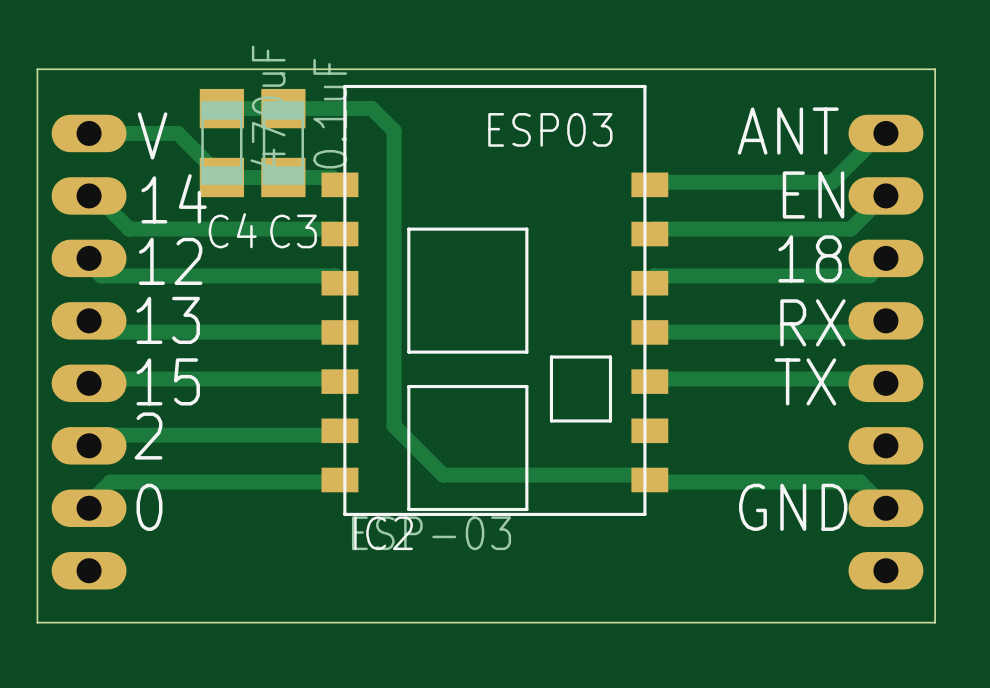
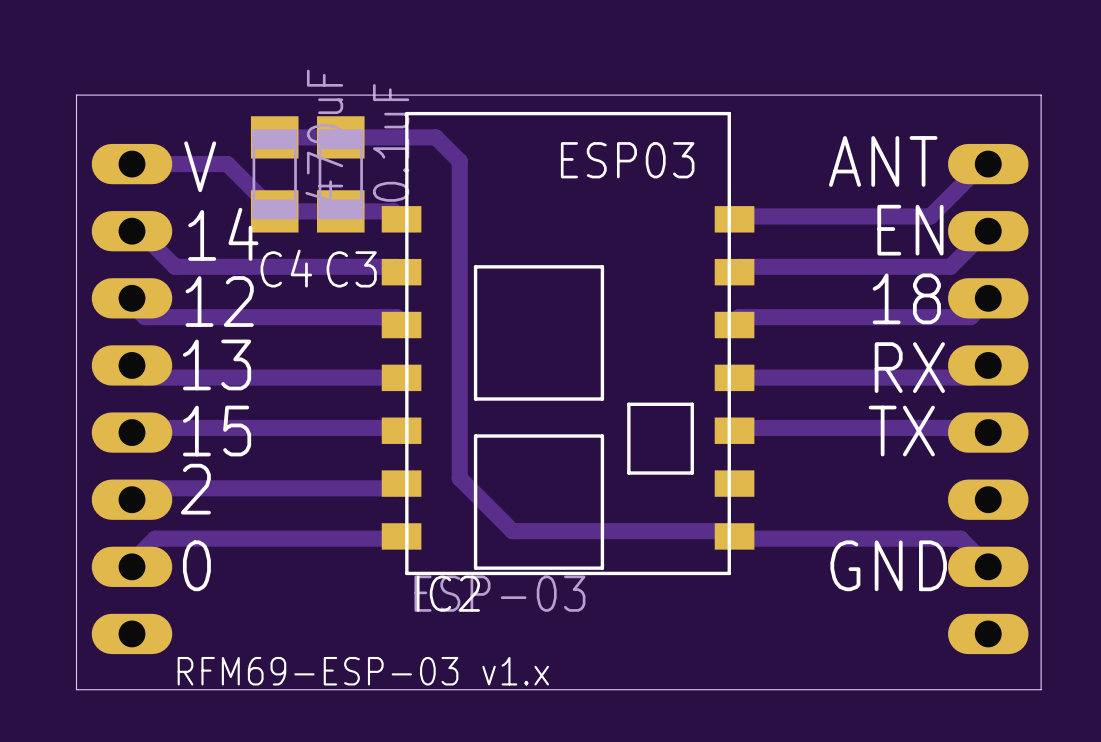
text: none -> RFM69-ESP-03 v1.x (363, 671)

